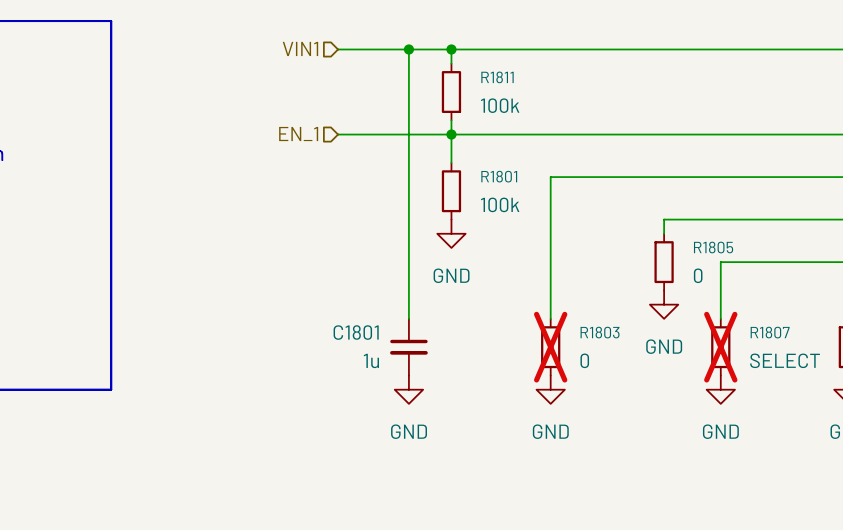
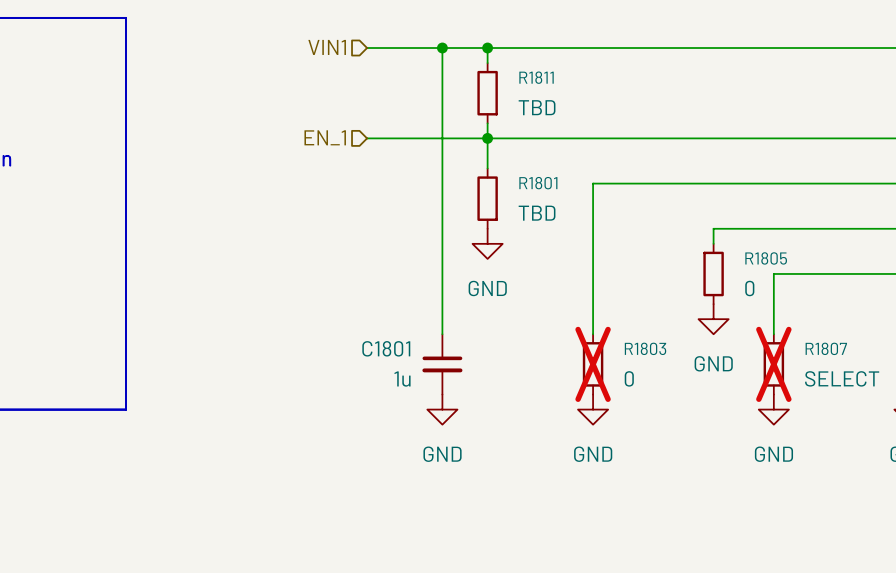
R1811 value: 100k (500, 105) -> TBD (537, 107)
R1801 value: 100k (500, 204) -> TBD (537, 213)

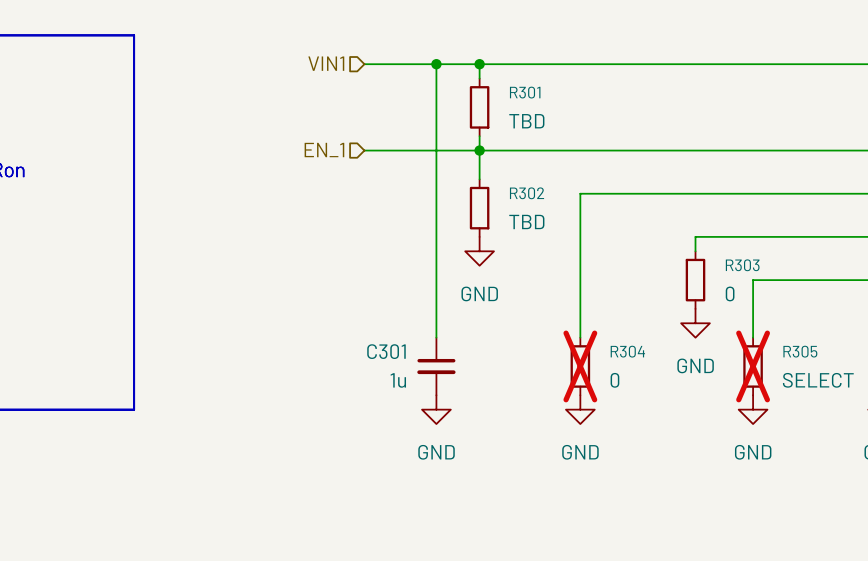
R1811 name: R1811 (536, 77) -> R301 (525, 92)
R1801 name: R1801 (538, 183) -> R302 (527, 193)
R1805 name: R1805 (766, 258) -> R303 (742, 265)
C1801 name: C1801 (386, 348) -> C301 (386, 351)
R1803 name: R1803 (645, 348) -> R304 (627, 351)
R1807 name: R1807 (826, 348) -> R305 (800, 351)

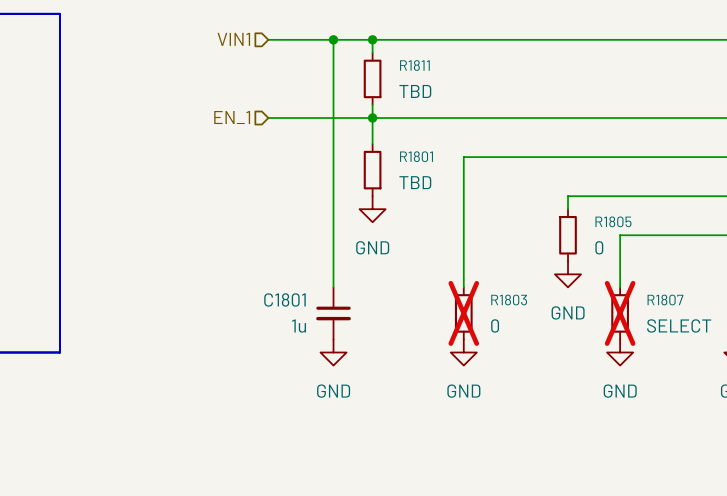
R301 name: R301 (525, 92) -> R1811 (414, 65)
R302 name: R302 (527, 193) -> R1801 (416, 156)
R303 name: R303 (742, 265) -> R1805 (613, 221)
C301 name: C301 (386, 351) -> C1801 (284, 299)
R304 name: R304 (627, 351) -> R1803 (509, 300)
R305 name: R305 (800, 351) -> R1807 (665, 300)

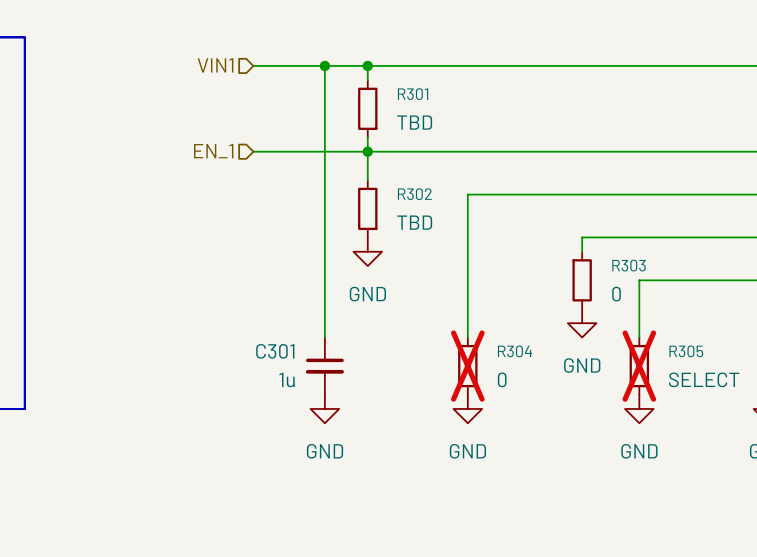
R1811 name: R1811 (414, 65) -> R301 (413, 94)
R1801 name: R1801 (416, 156) -> R302 (414, 194)
R1805 name: R1805 (613, 221) -> R303 (629, 265)
C1801 name: C1801 (284, 299) -> C301 (275, 351)
R1803 name: R1803 (509, 300) -> R304 (515, 351)
R1807 name: R1807 (665, 300) -> R305 (686, 351)

